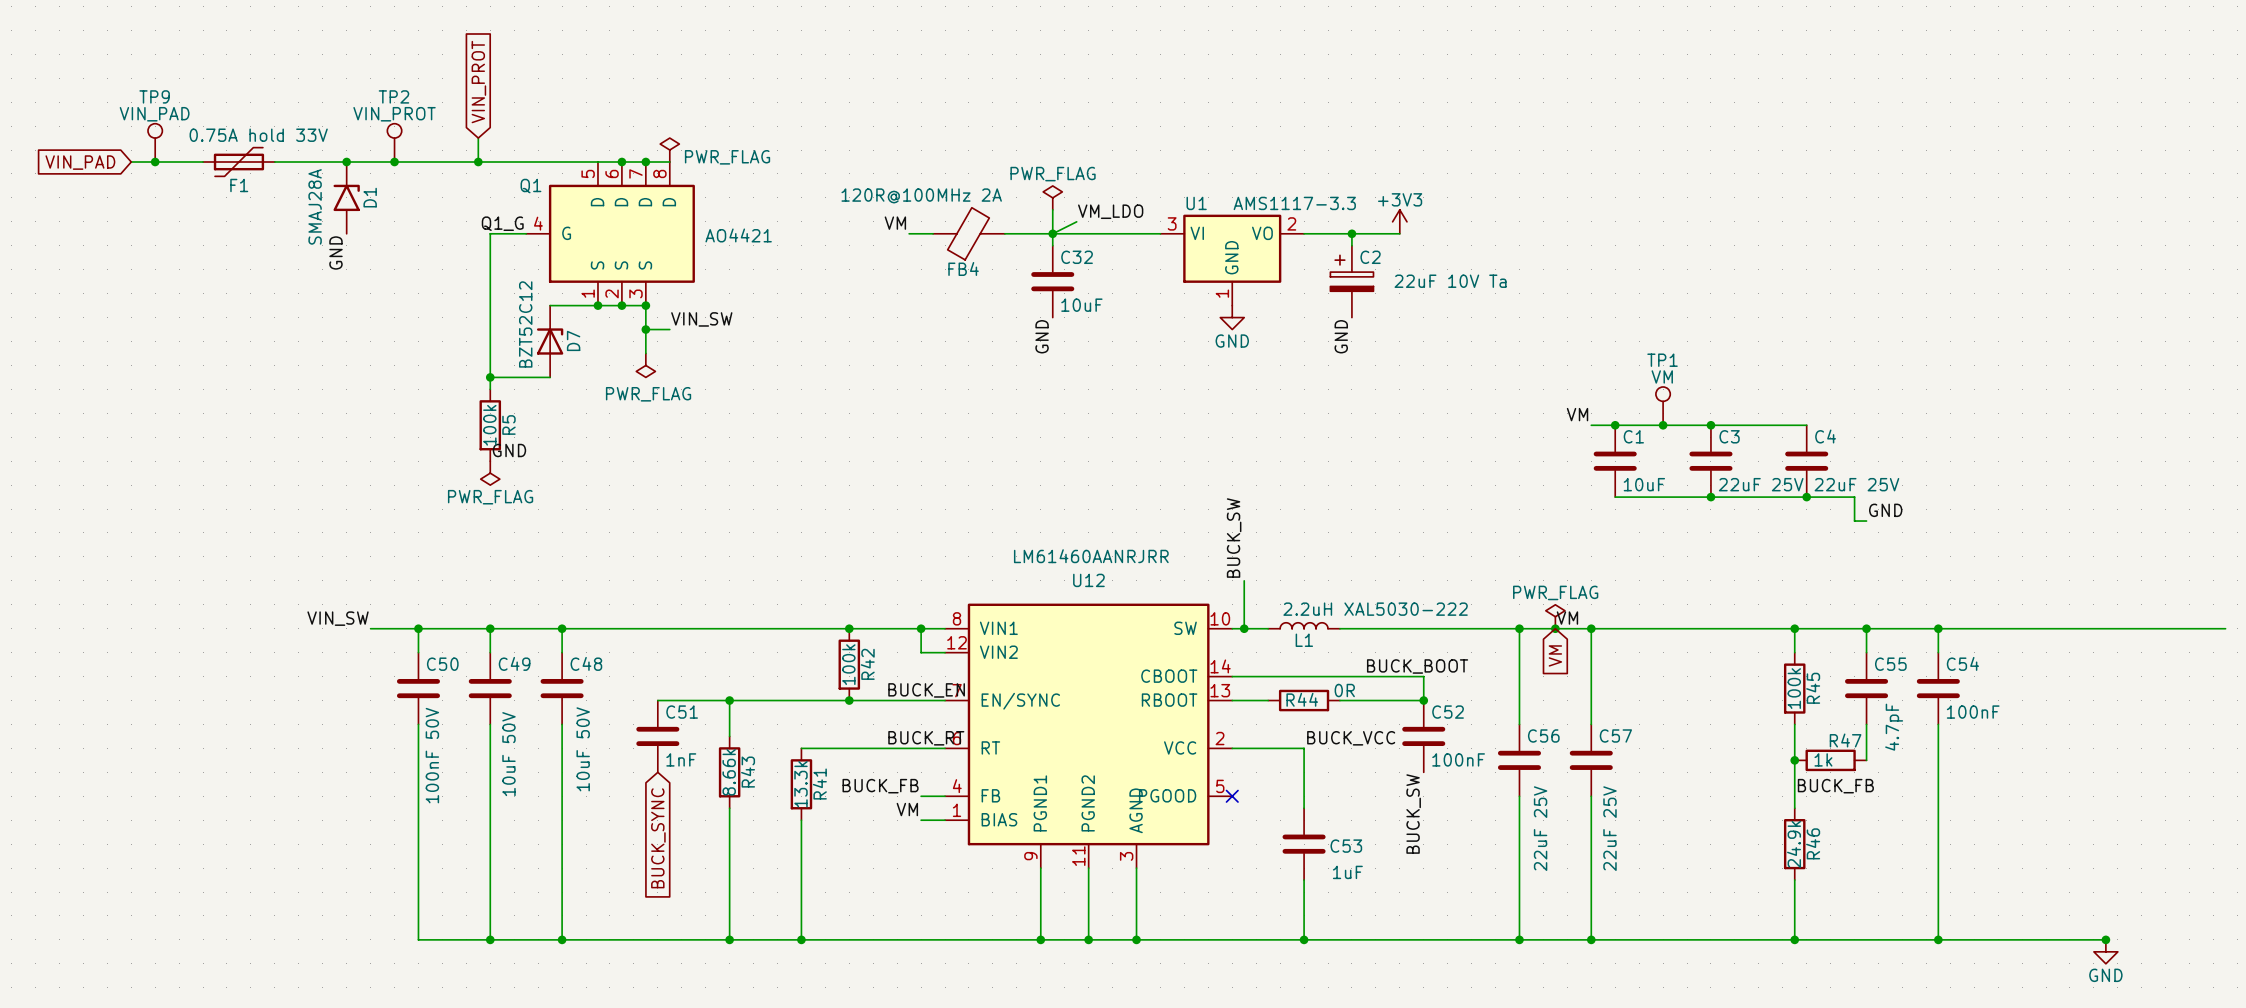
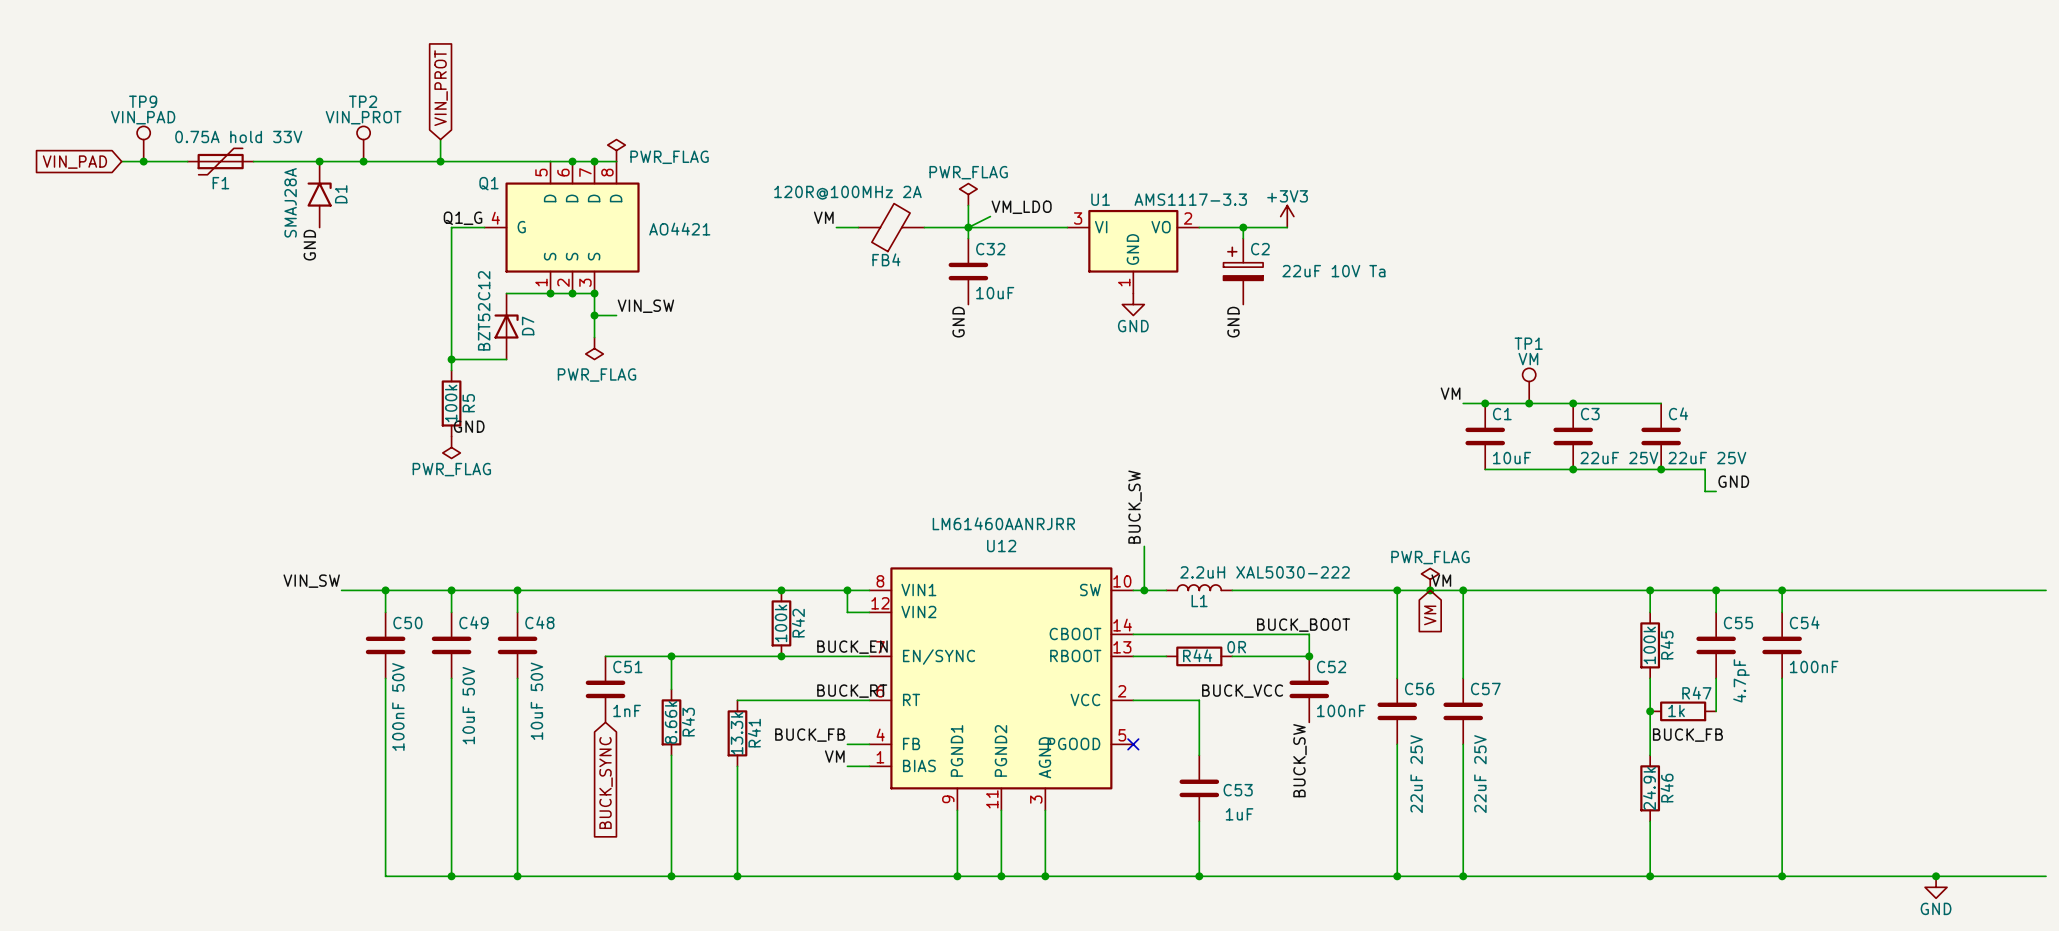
wire: none -> (1936, 876) (2046, 876)

